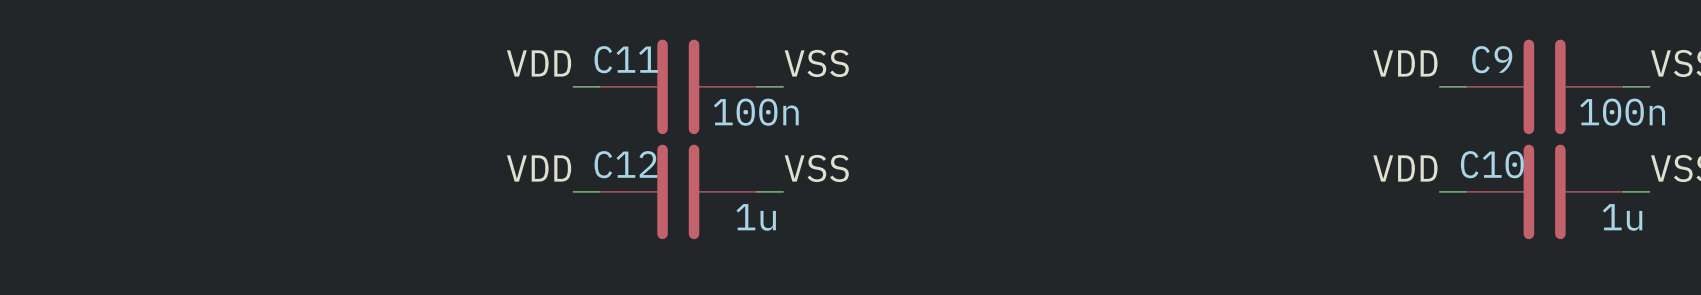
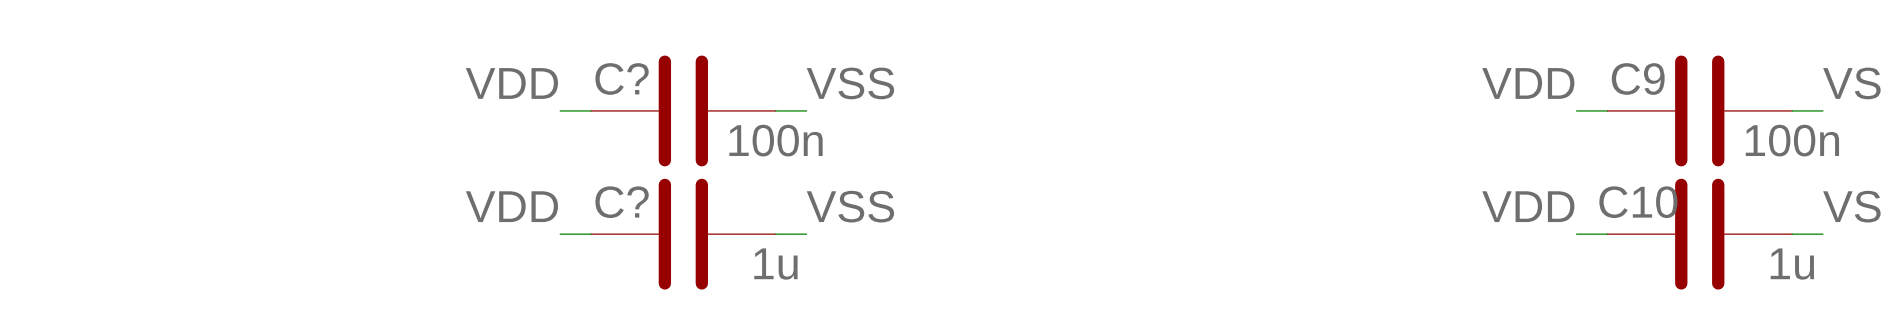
C11 name: C11 (626, 59) -> C? (622, 78)
C12 name: C12 (625, 164) -> C? (622, 202)

